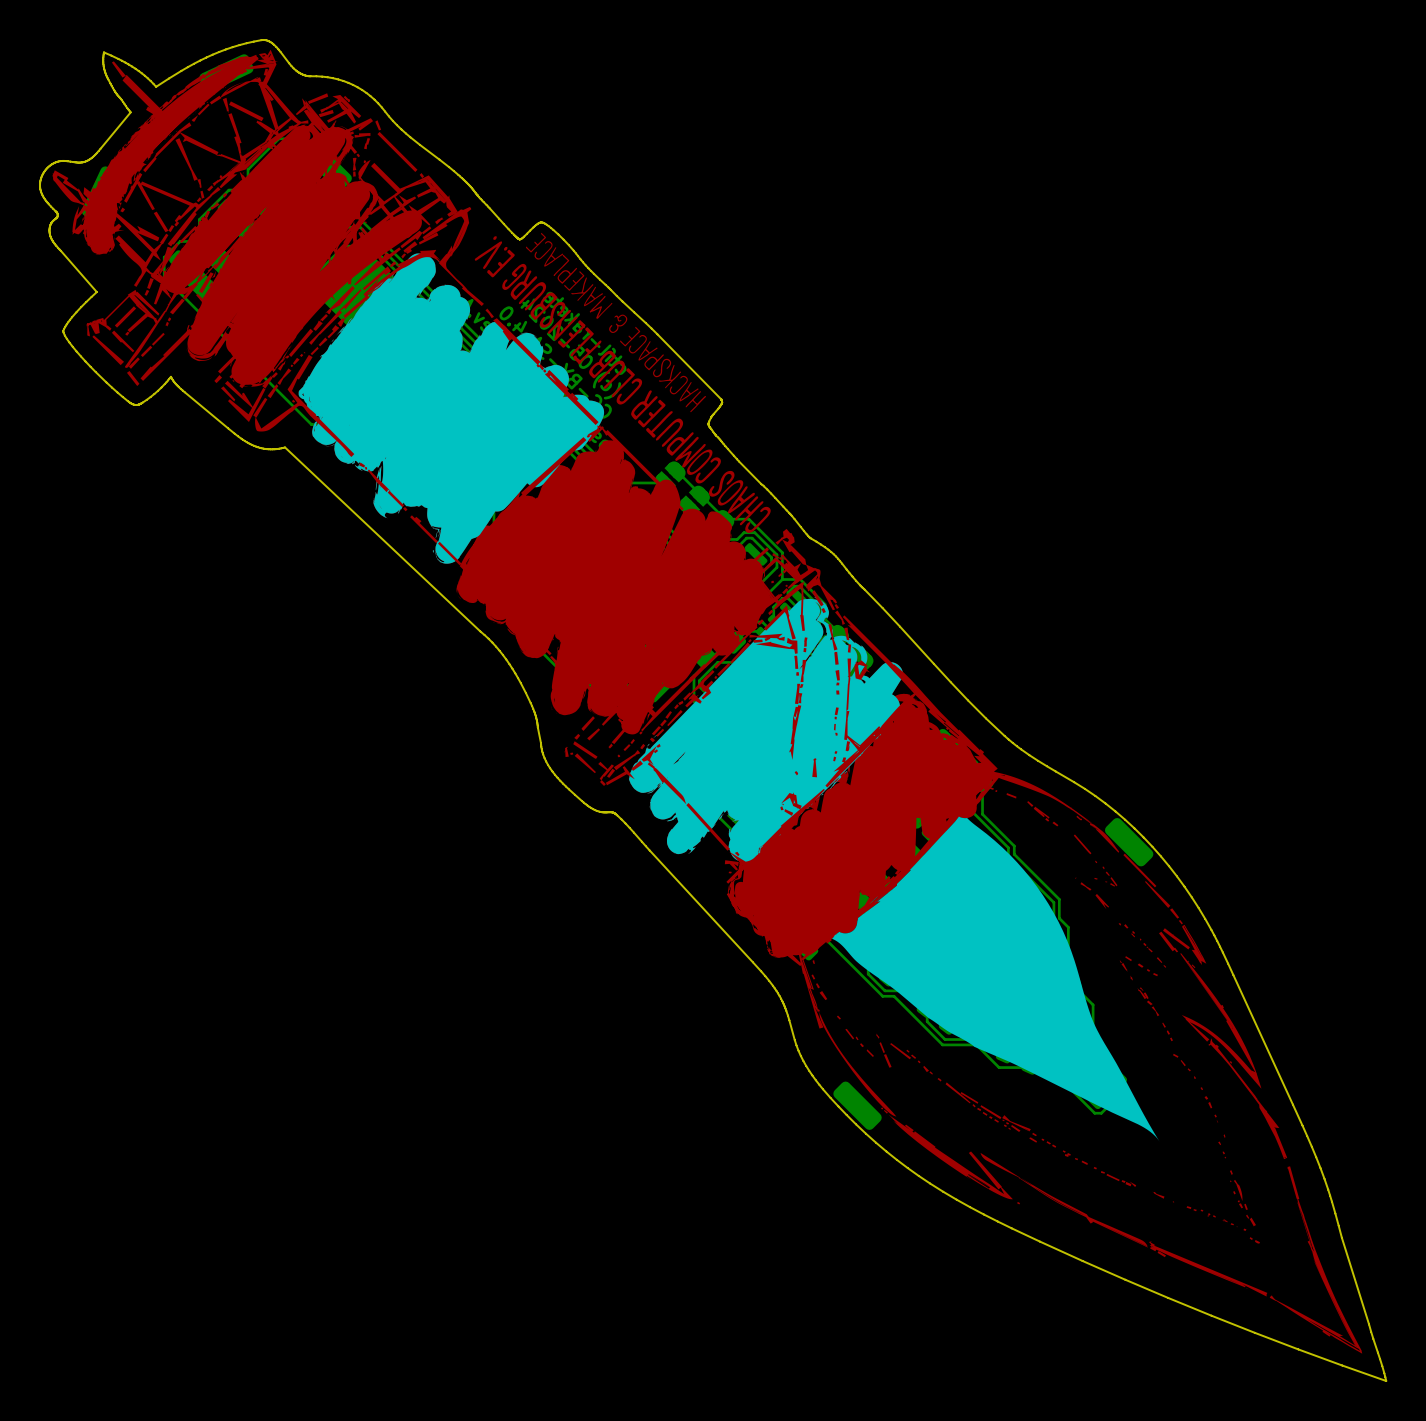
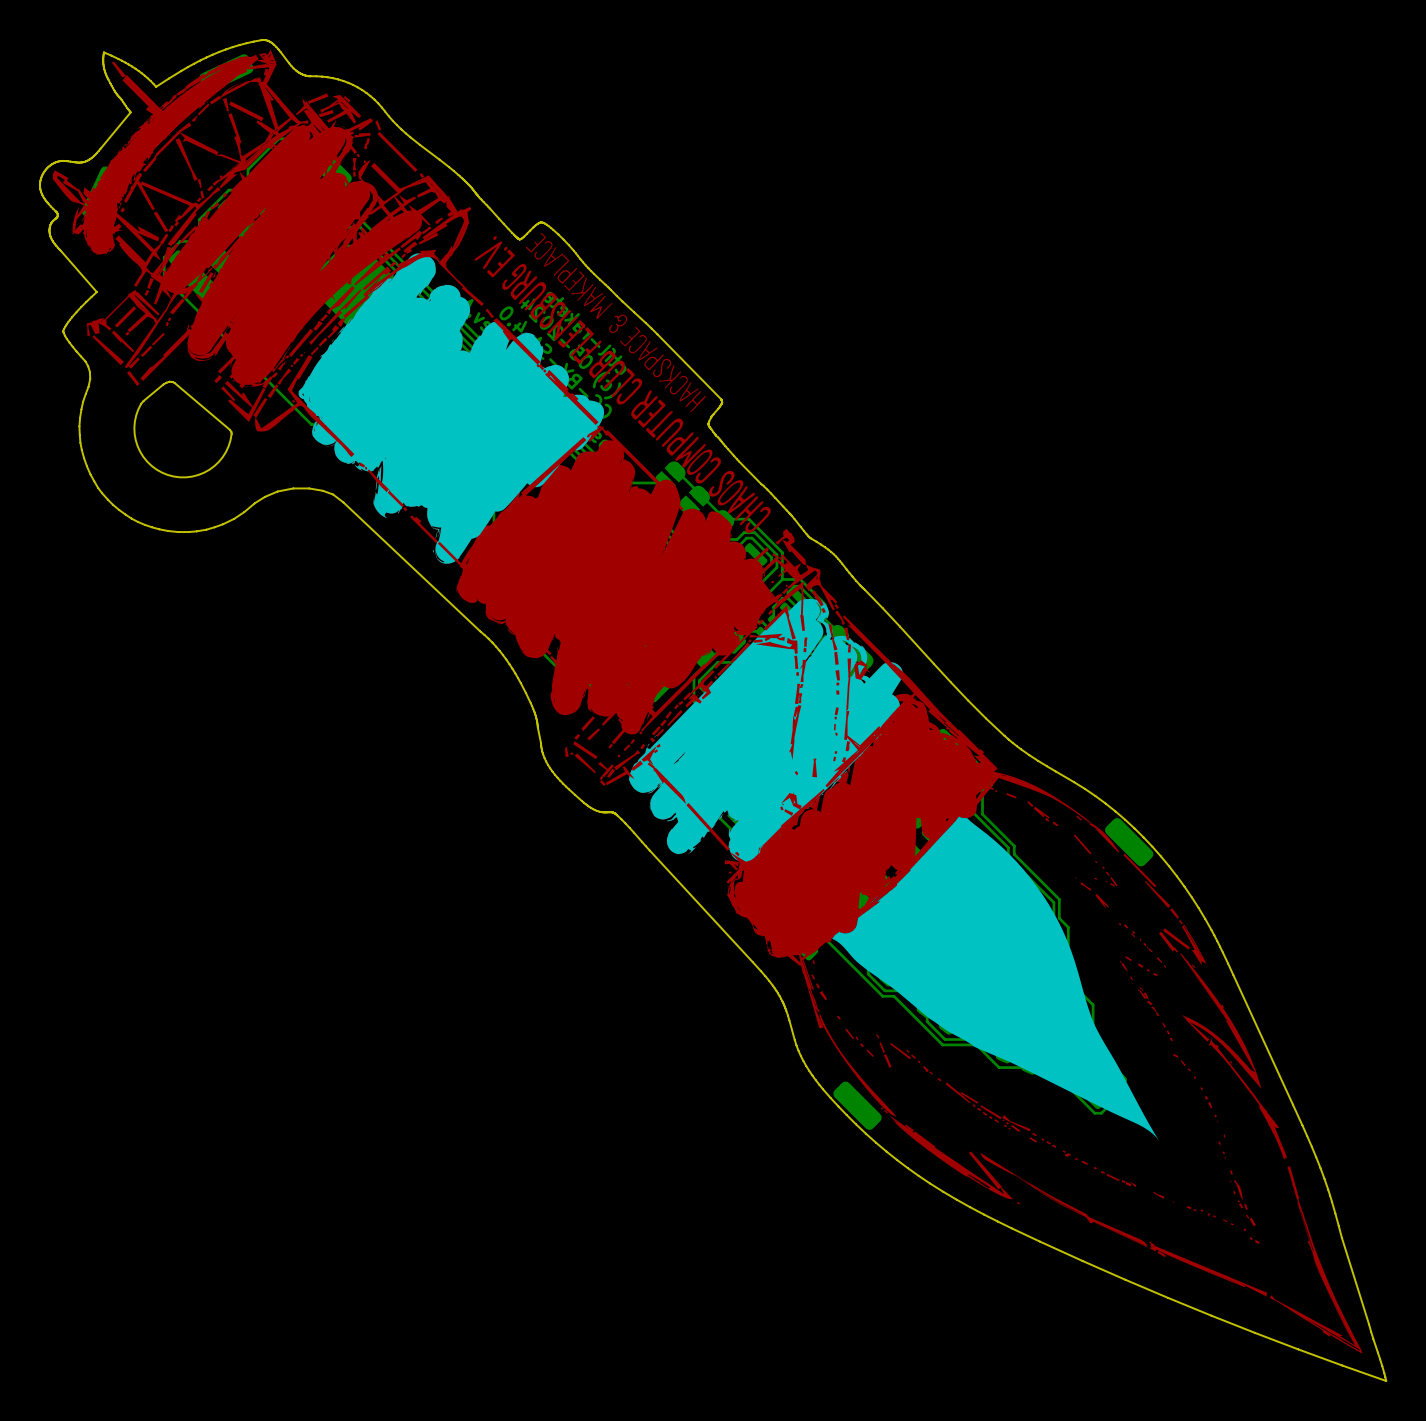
board edge: (85, 361) (112, 387) (132, 404) (138, 404) (146, 399) (170, 376) (180, 388) (244, 441) (265, 448) (285, 447) (480, 631) -> (85, 361) (89, 371) (90, 378) (80, 417) (81, 449) (86, 466) (98, 487) (113, 505) (125, 514) (137, 521) (159, 529) (178, 532) (196, 531) (214, 527) (234, 518) (264, 496) (277, 491) (293, 488) (323, 490) (333, 494) (343, 502) (480, 631)
board edge: none -> (169, 381) (163, 384) (141, 404) (134, 421) (135, 439) (143, 456) (151, 465) (162, 472) (179, 477) (198, 475) (214, 466) (222, 456) (228, 446) (231, 432) (174, 383) (169, 381)

